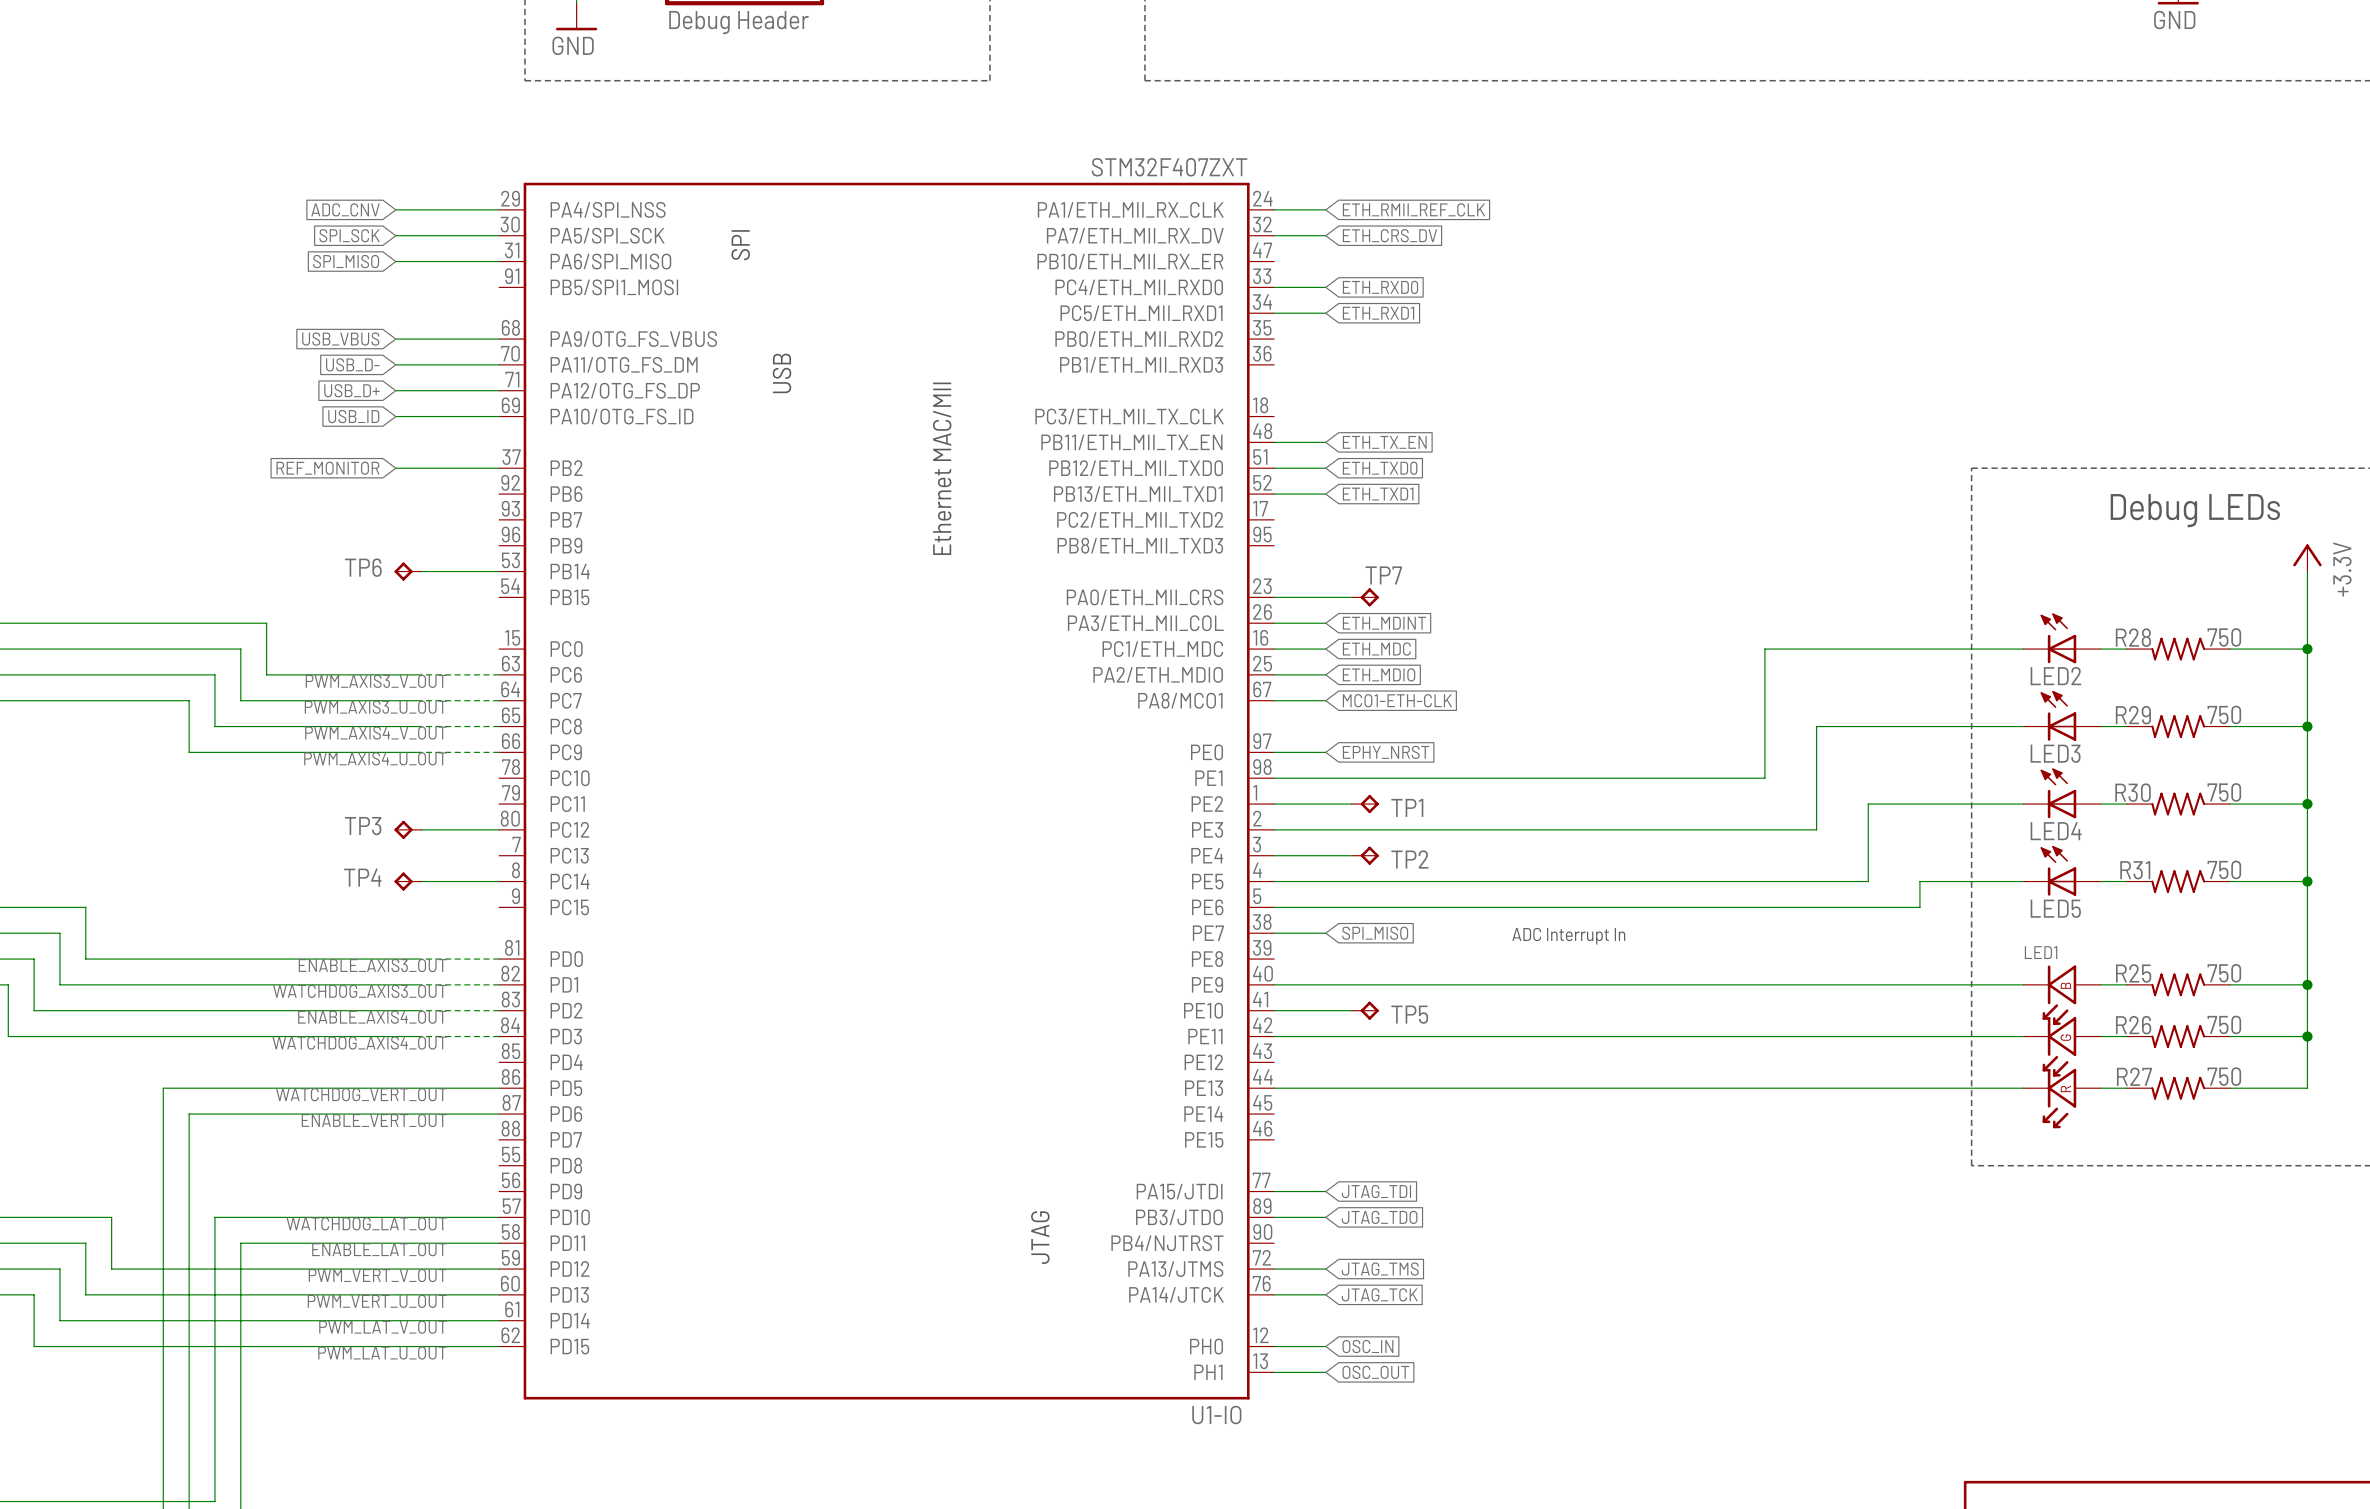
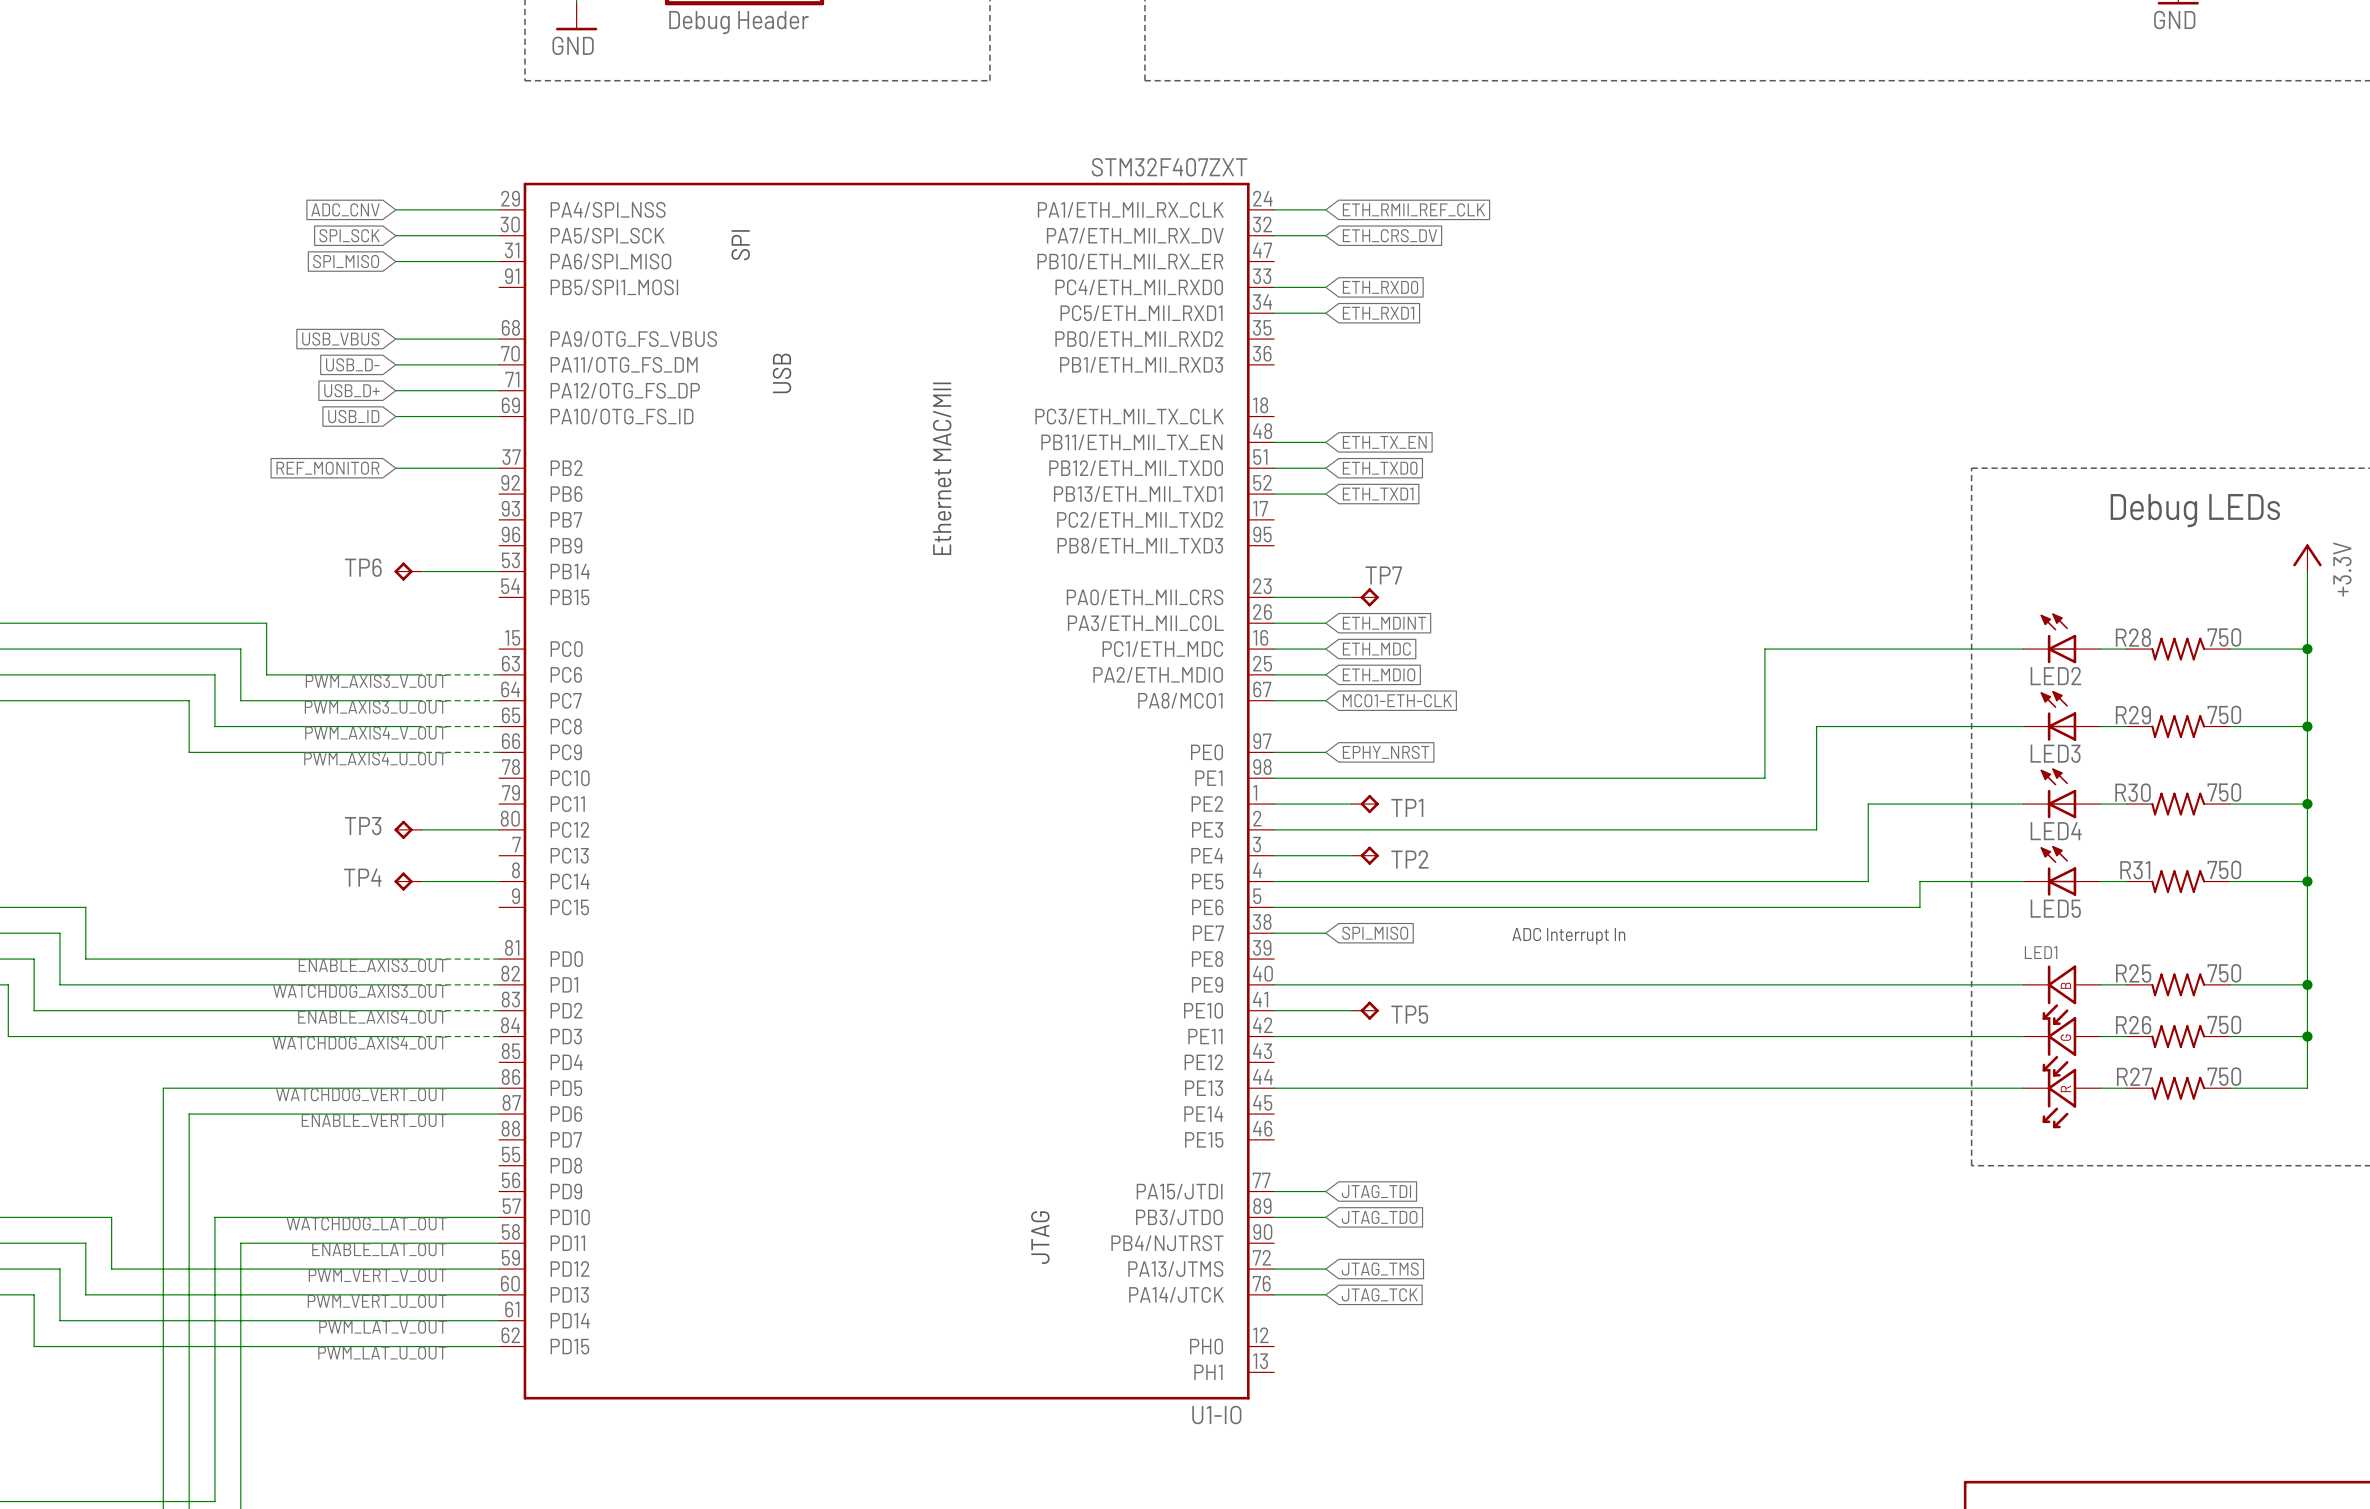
wire: (1274, 1346) (1325, 1346) -> none
global label: OSC_IN (1367, 1346) -> none
wire: (1274, 1372) (1325, 1372) -> none
global label: OSC_OUT (1375, 1372) -> none

